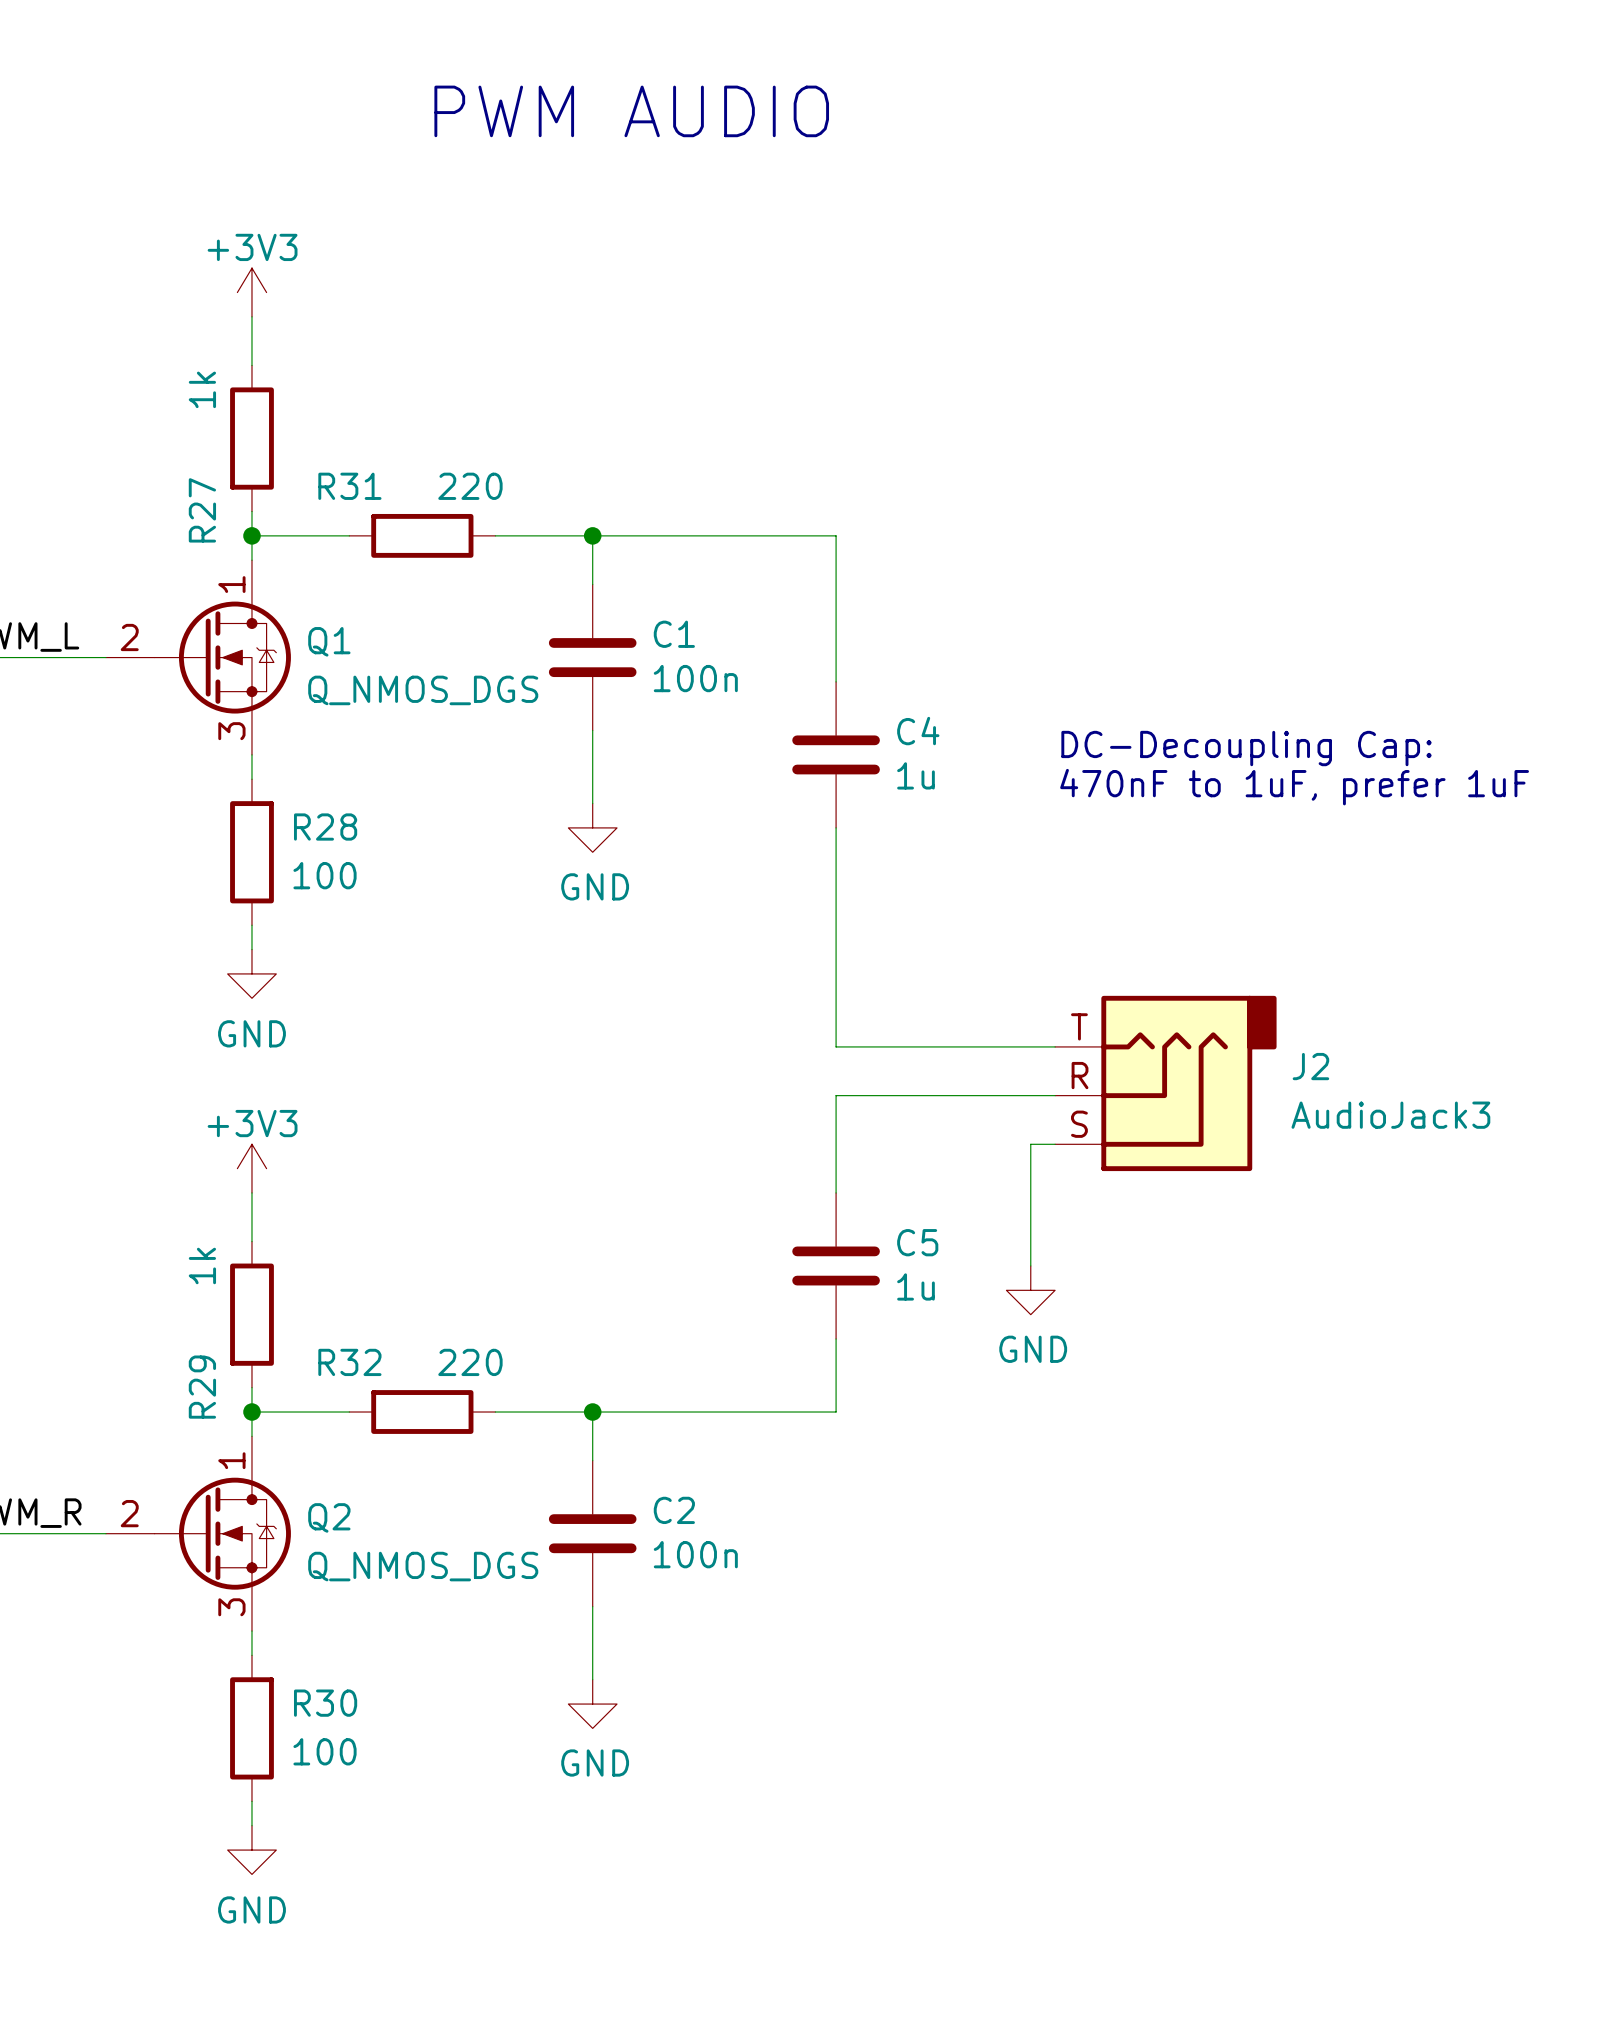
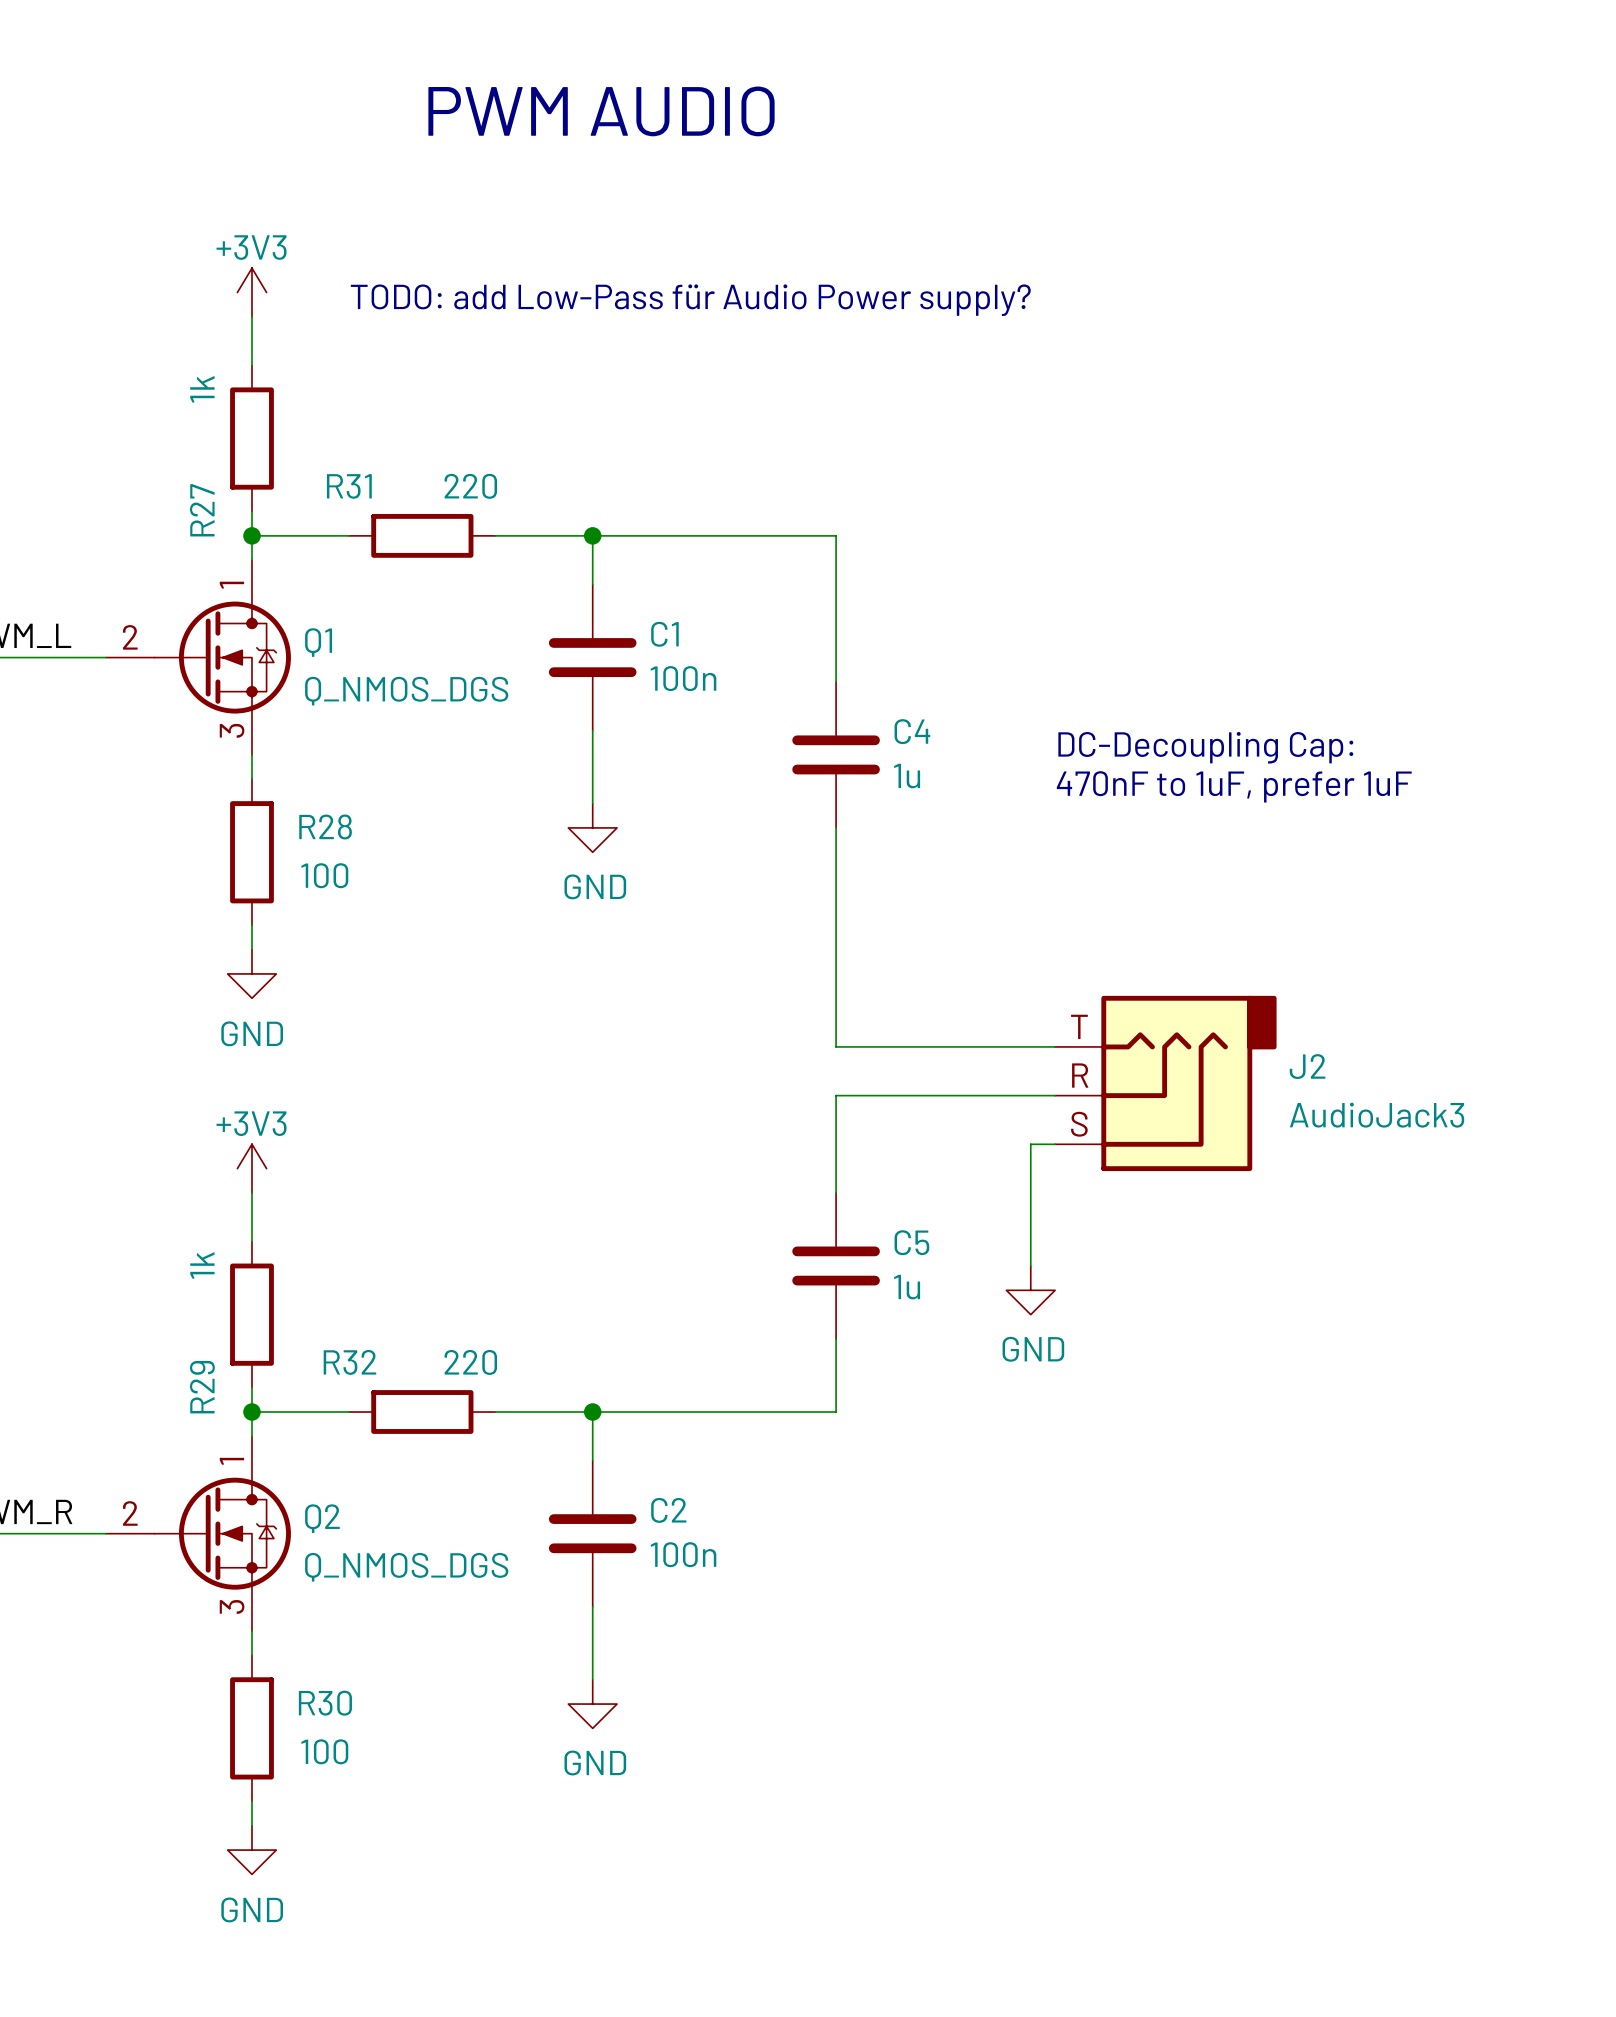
text: none -> TODO: add Low-Pass für Audio Power supply? (690, 300)

